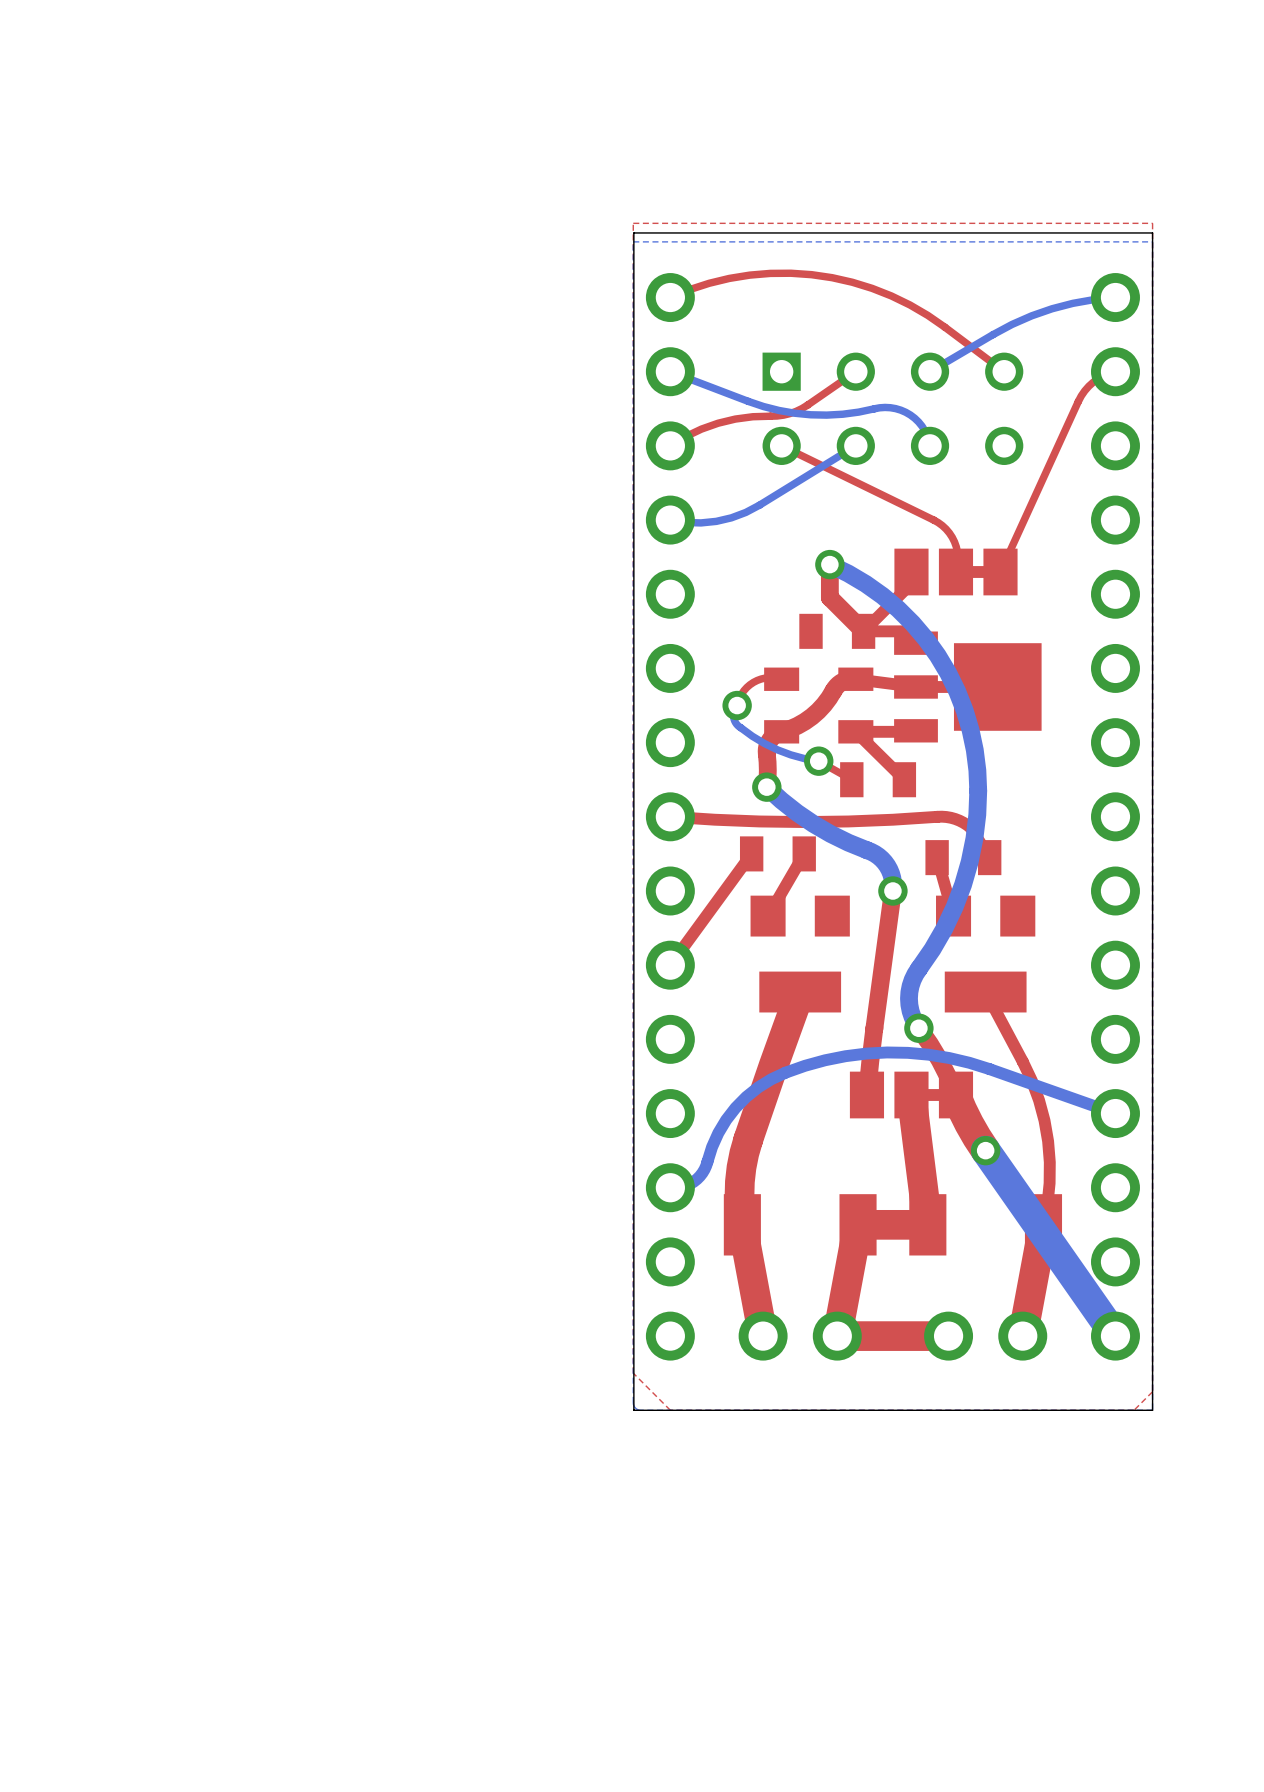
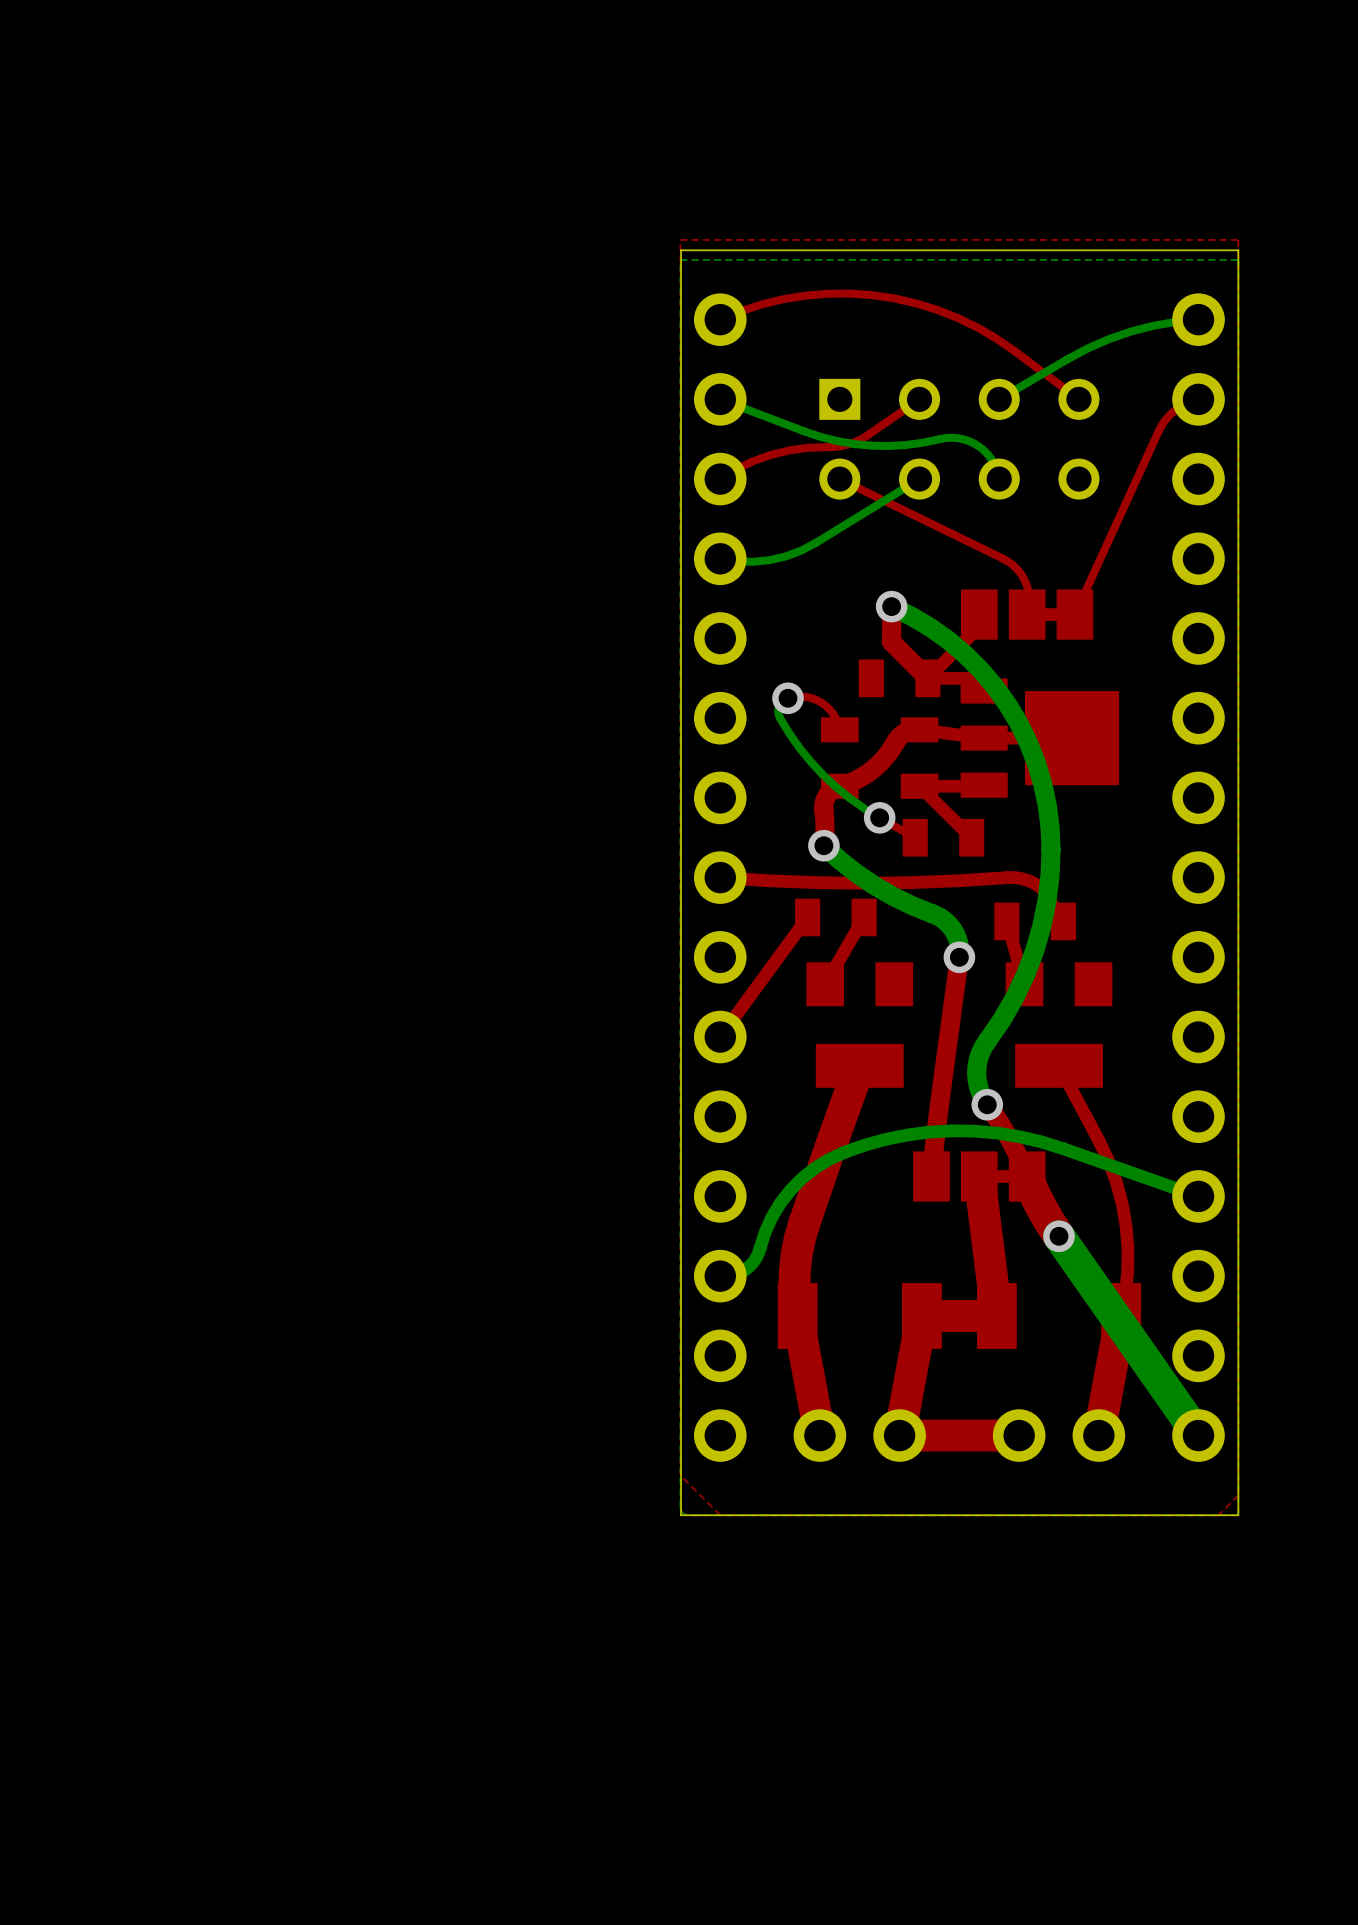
top track: (781, 679) (765, 678) (753, 682) (744, 690) (737, 705) -> (839, 729) (831, 712) (821, 702) (802, 696) (788, 698)
bottom track: (737, 705) (733, 712) (734, 721) (752, 736) (777, 749) (818, 761) -> (788, 698) (780, 704) (778, 714) (799, 748) (836, 787) (879, 817)
via position: (737, 705) -> (788, 698)

